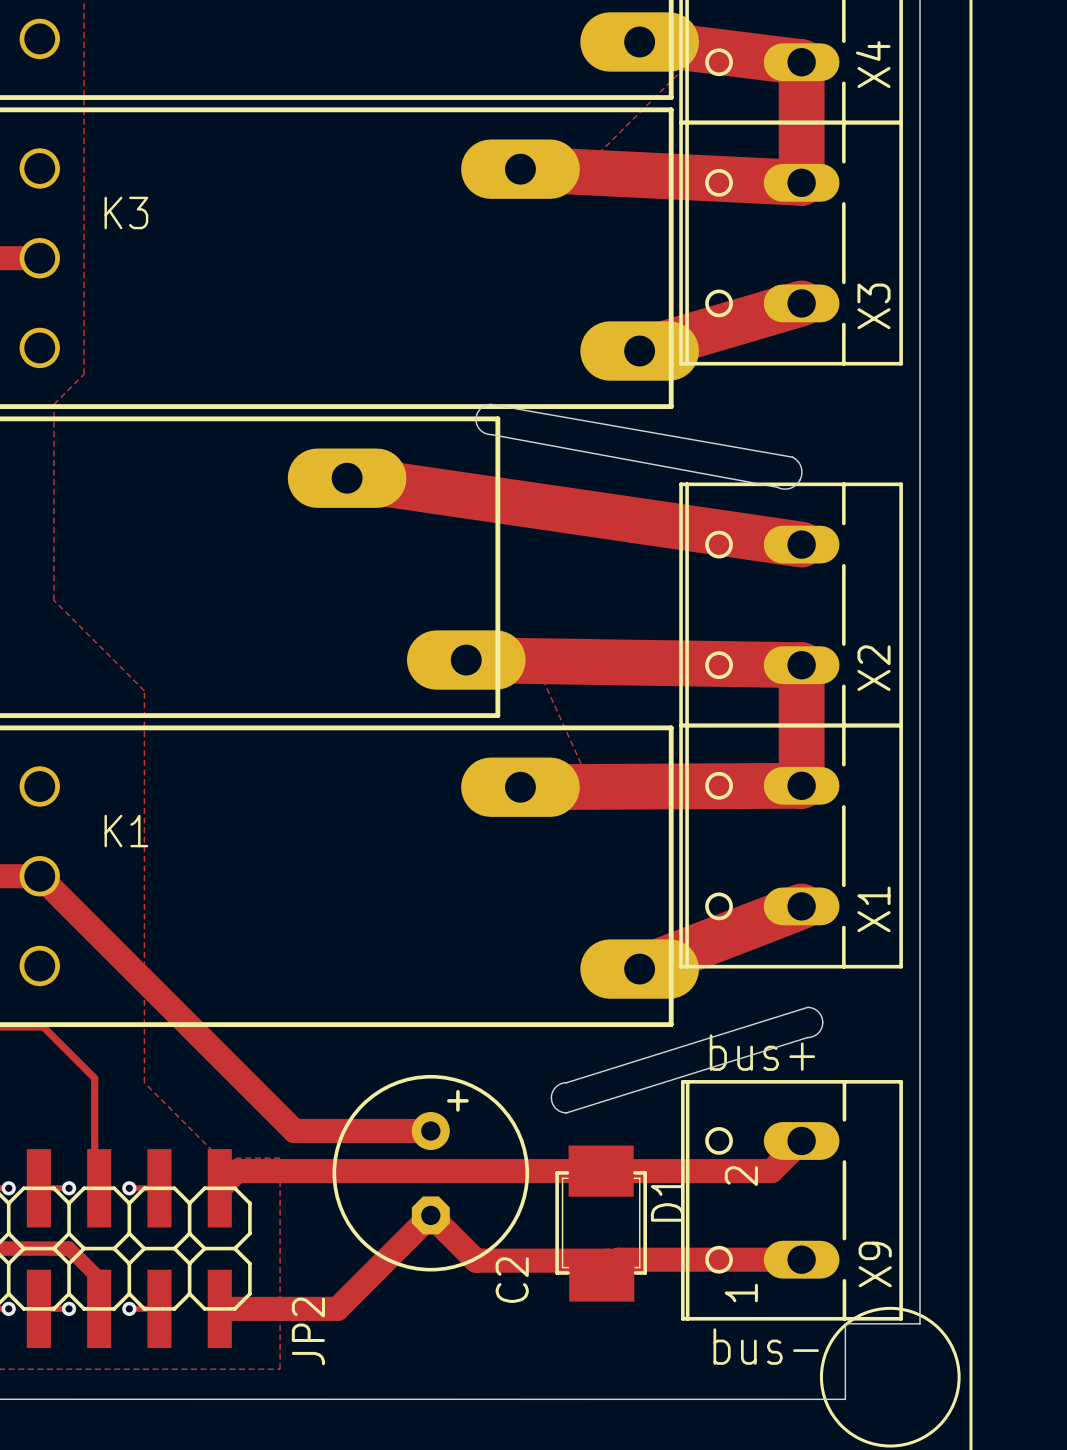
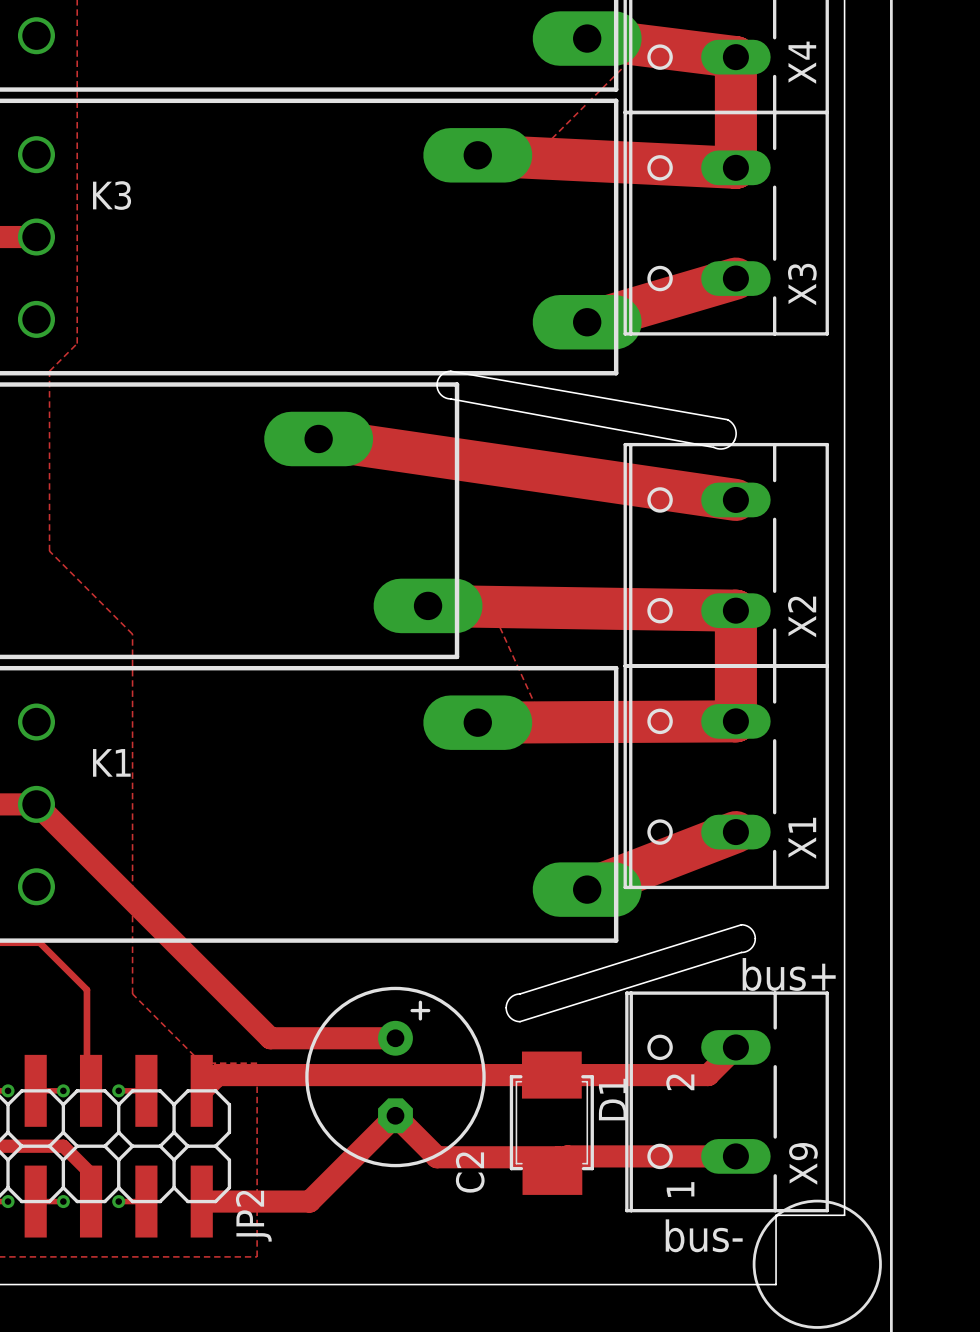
text position: bus+ (762, 1052) -> bus+ (789, 974)
JP2 name position: JP2 (308, 1331) -> JP2 (253, 1216)

